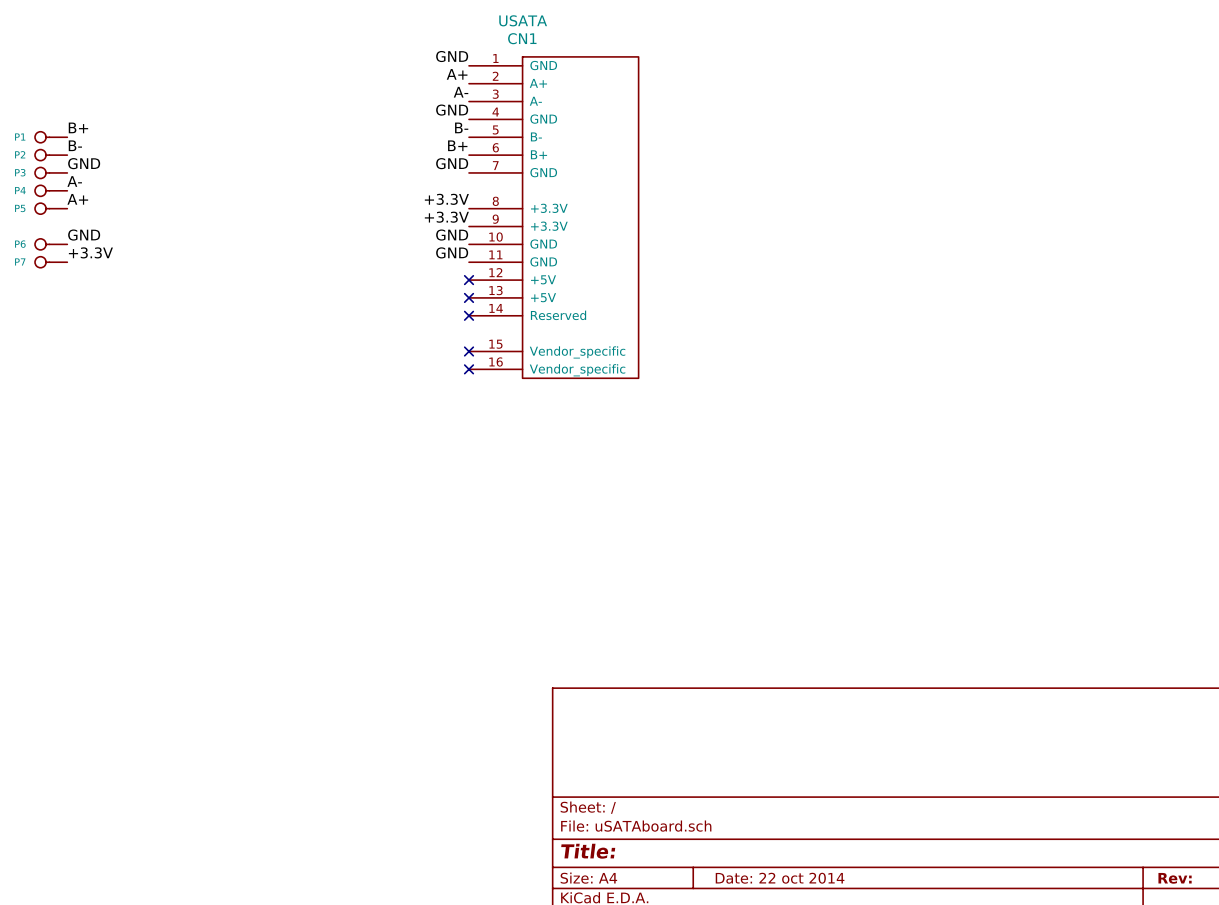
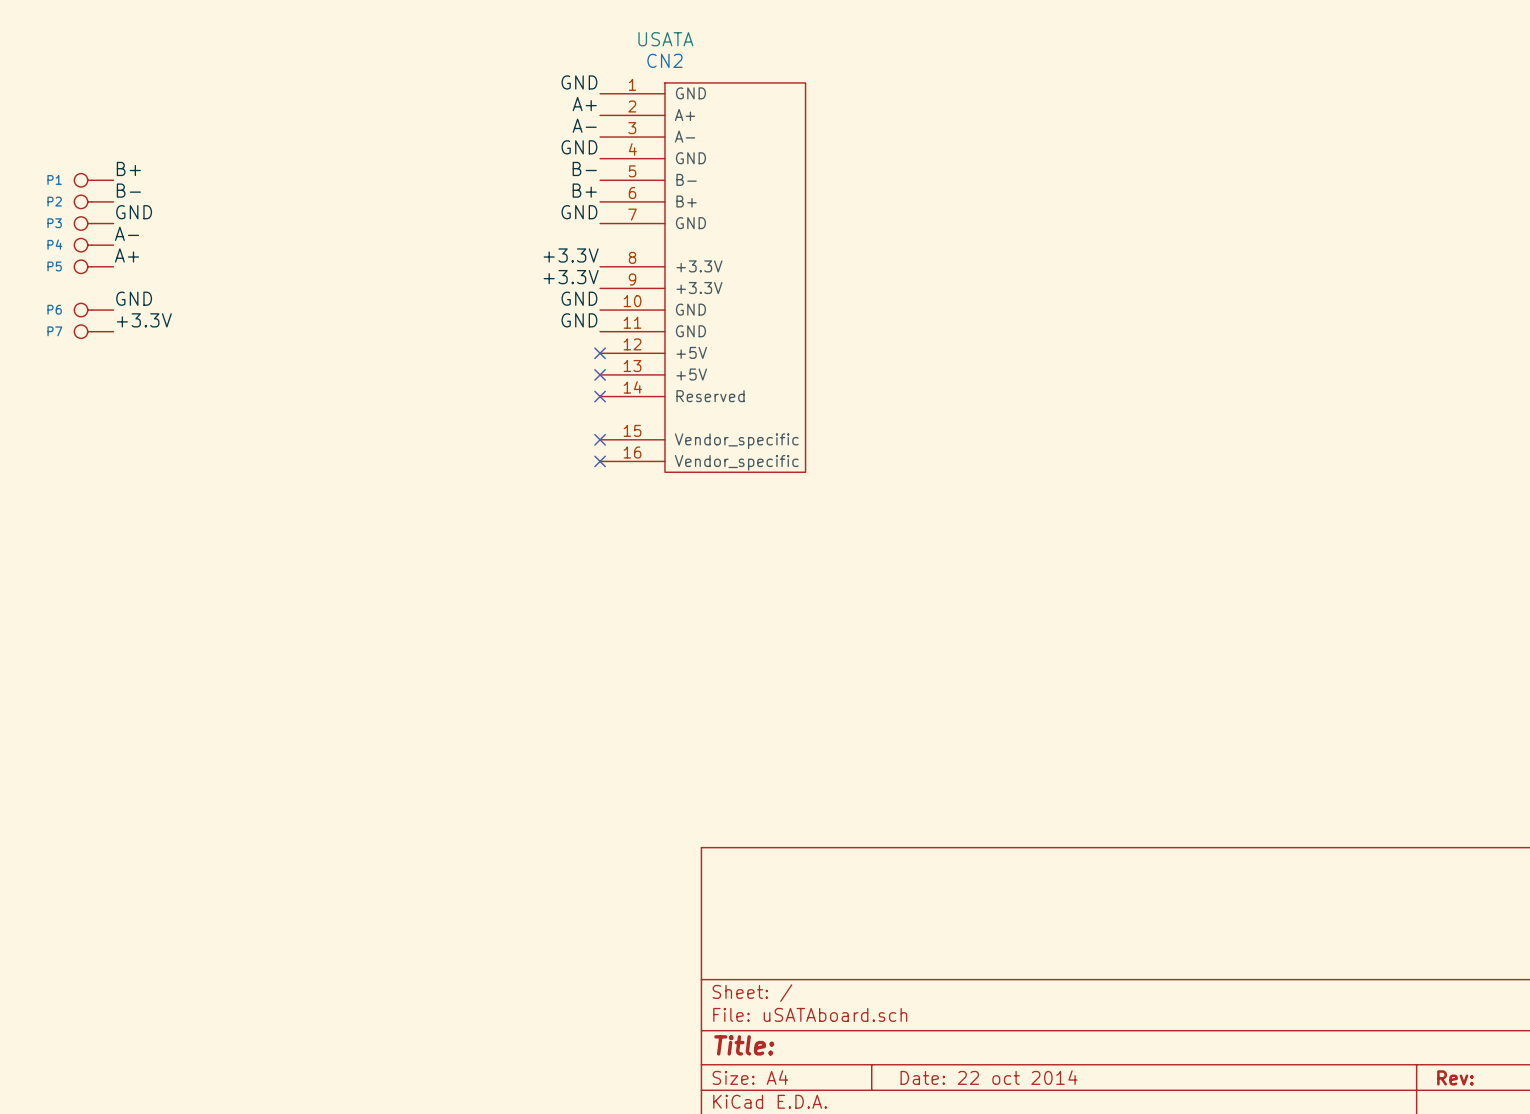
CN1 name: CN1 (522, 38) -> CN2 (664, 60)

